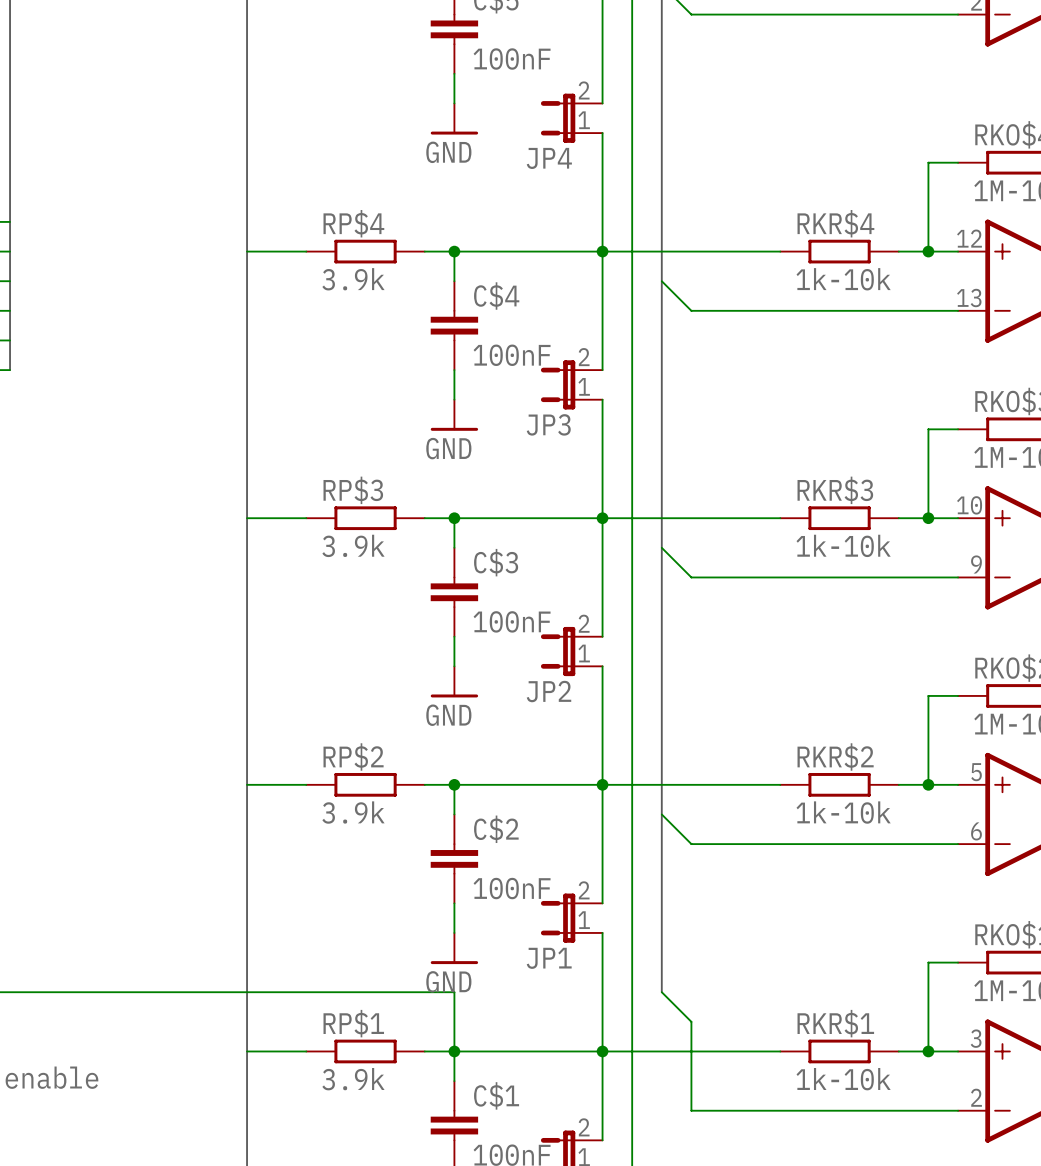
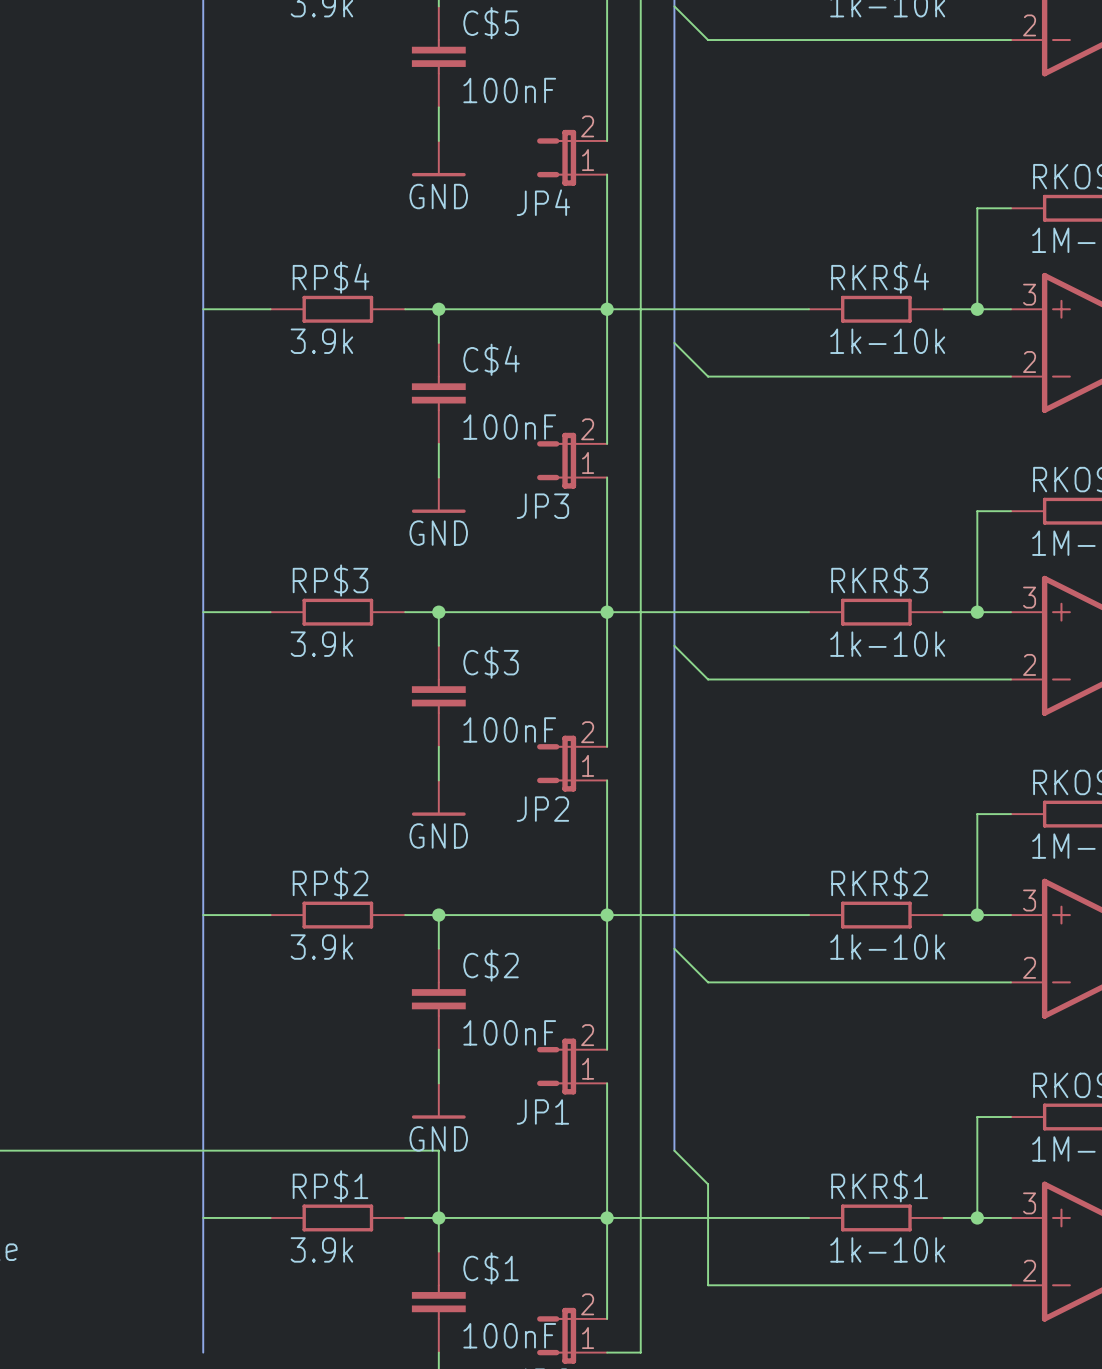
part pin number: 12 (969, 238) -> 3 (1029, 294)
part pin number: 13 (969, 298) -> 2 (1029, 362)
part pin number: 10 (969, 505) -> 3 (1029, 597)
part pin number: 9 (976, 564) -> 2 (1029, 664)
part pin number: 5 (976, 772) -> 3 (1029, 900)
part pin number: 6 (976, 831) -> 2 (1029, 967)

